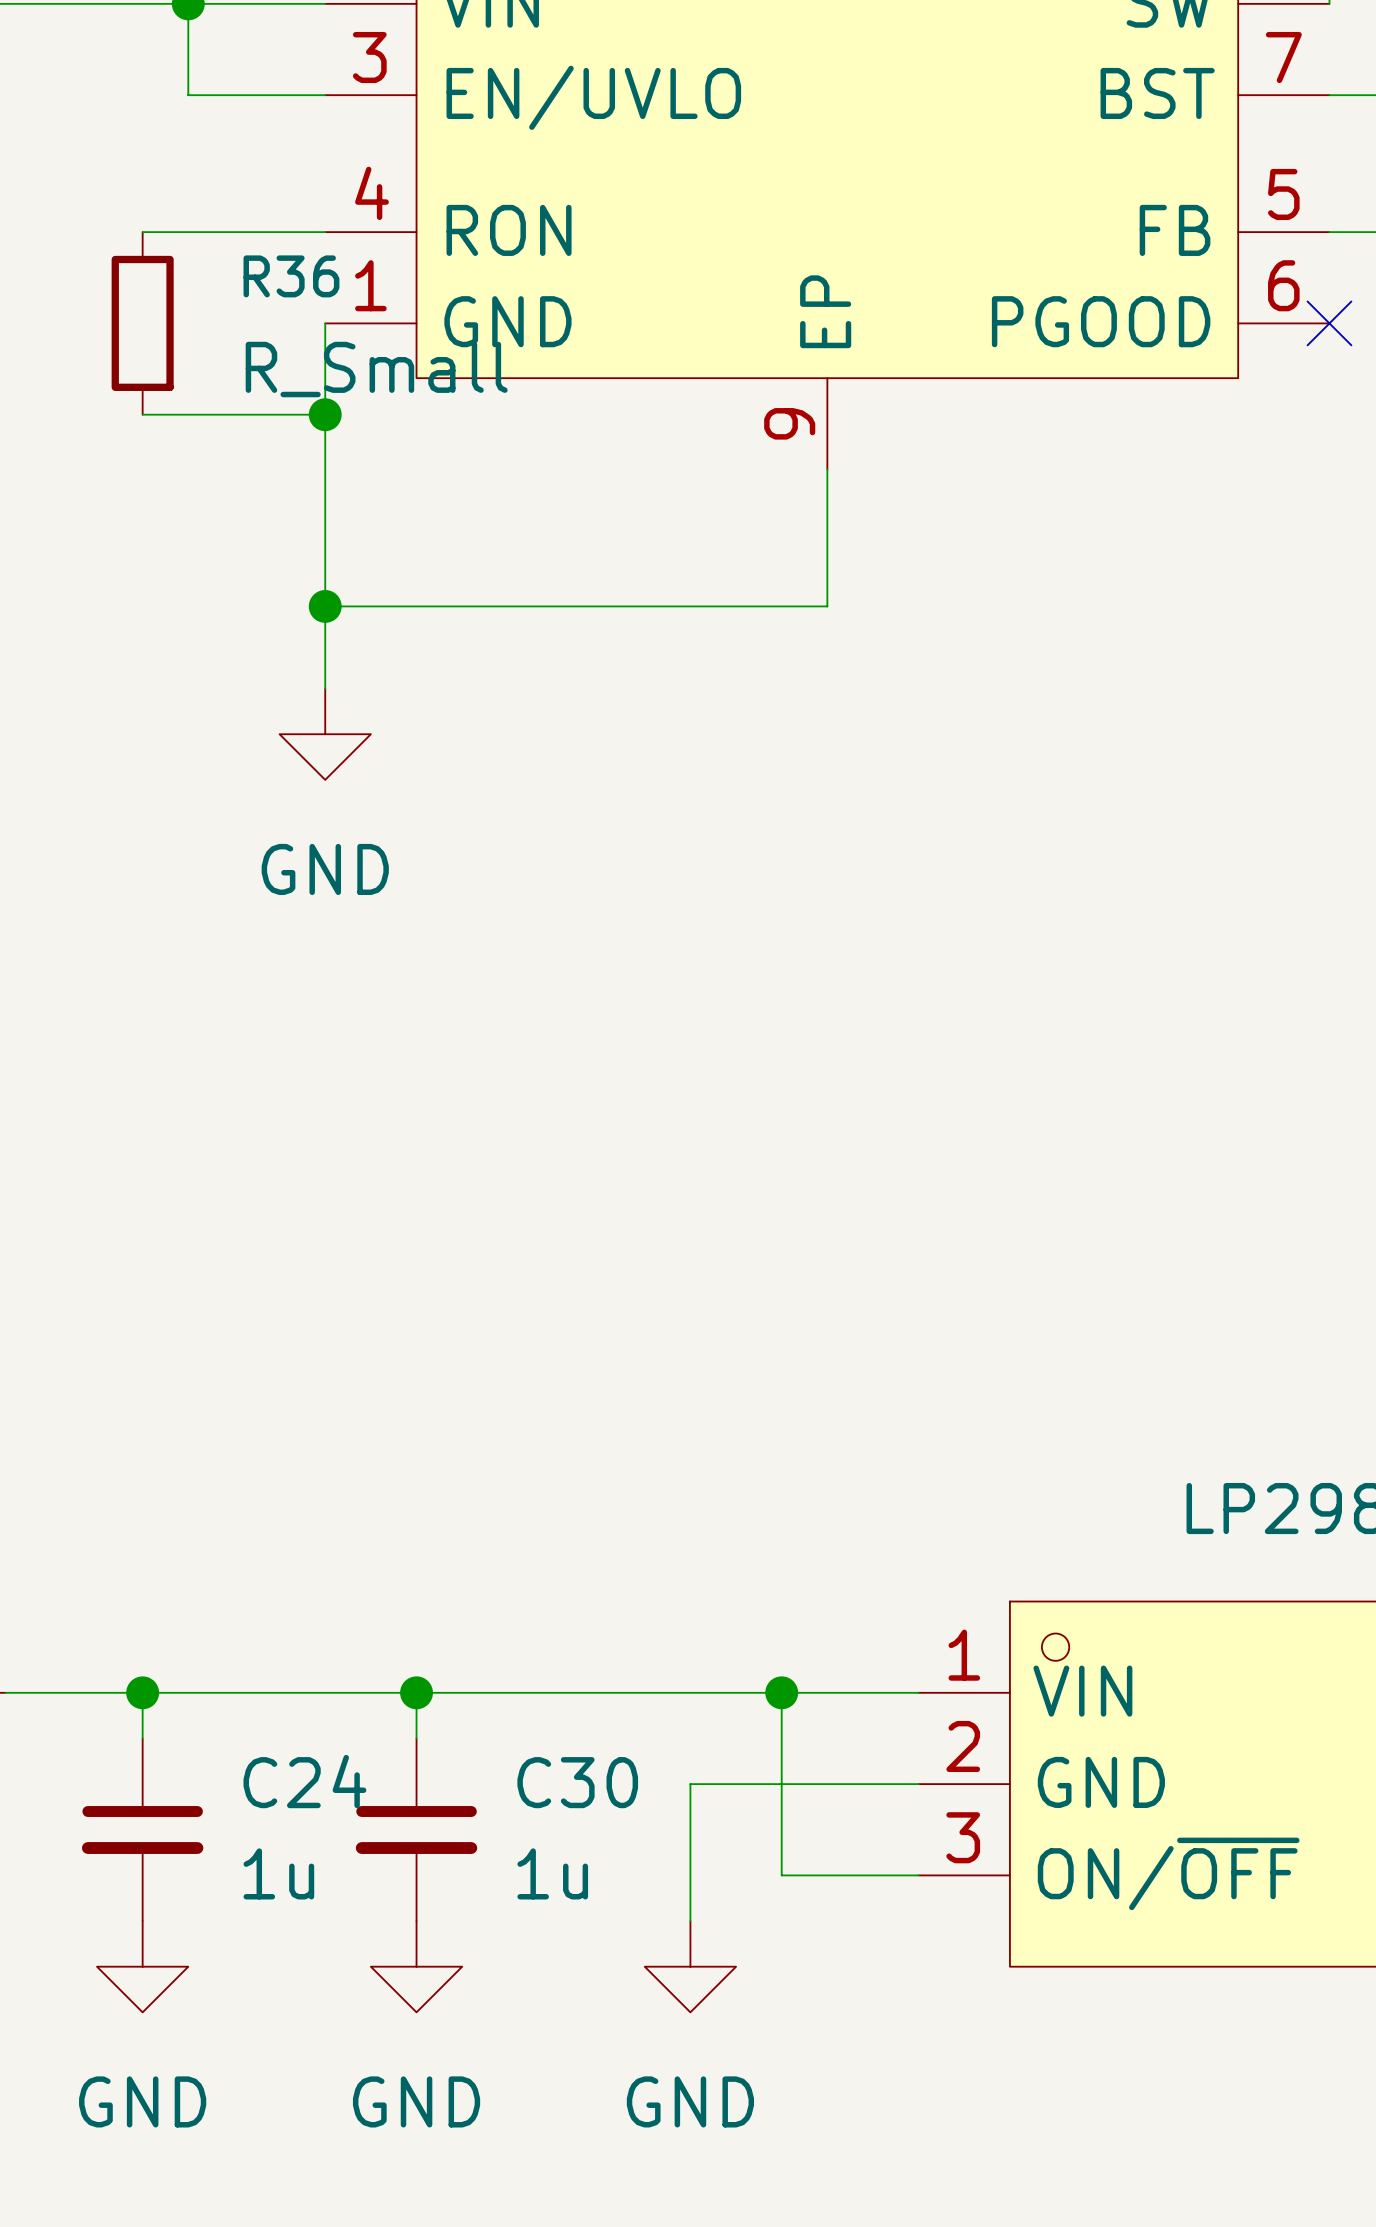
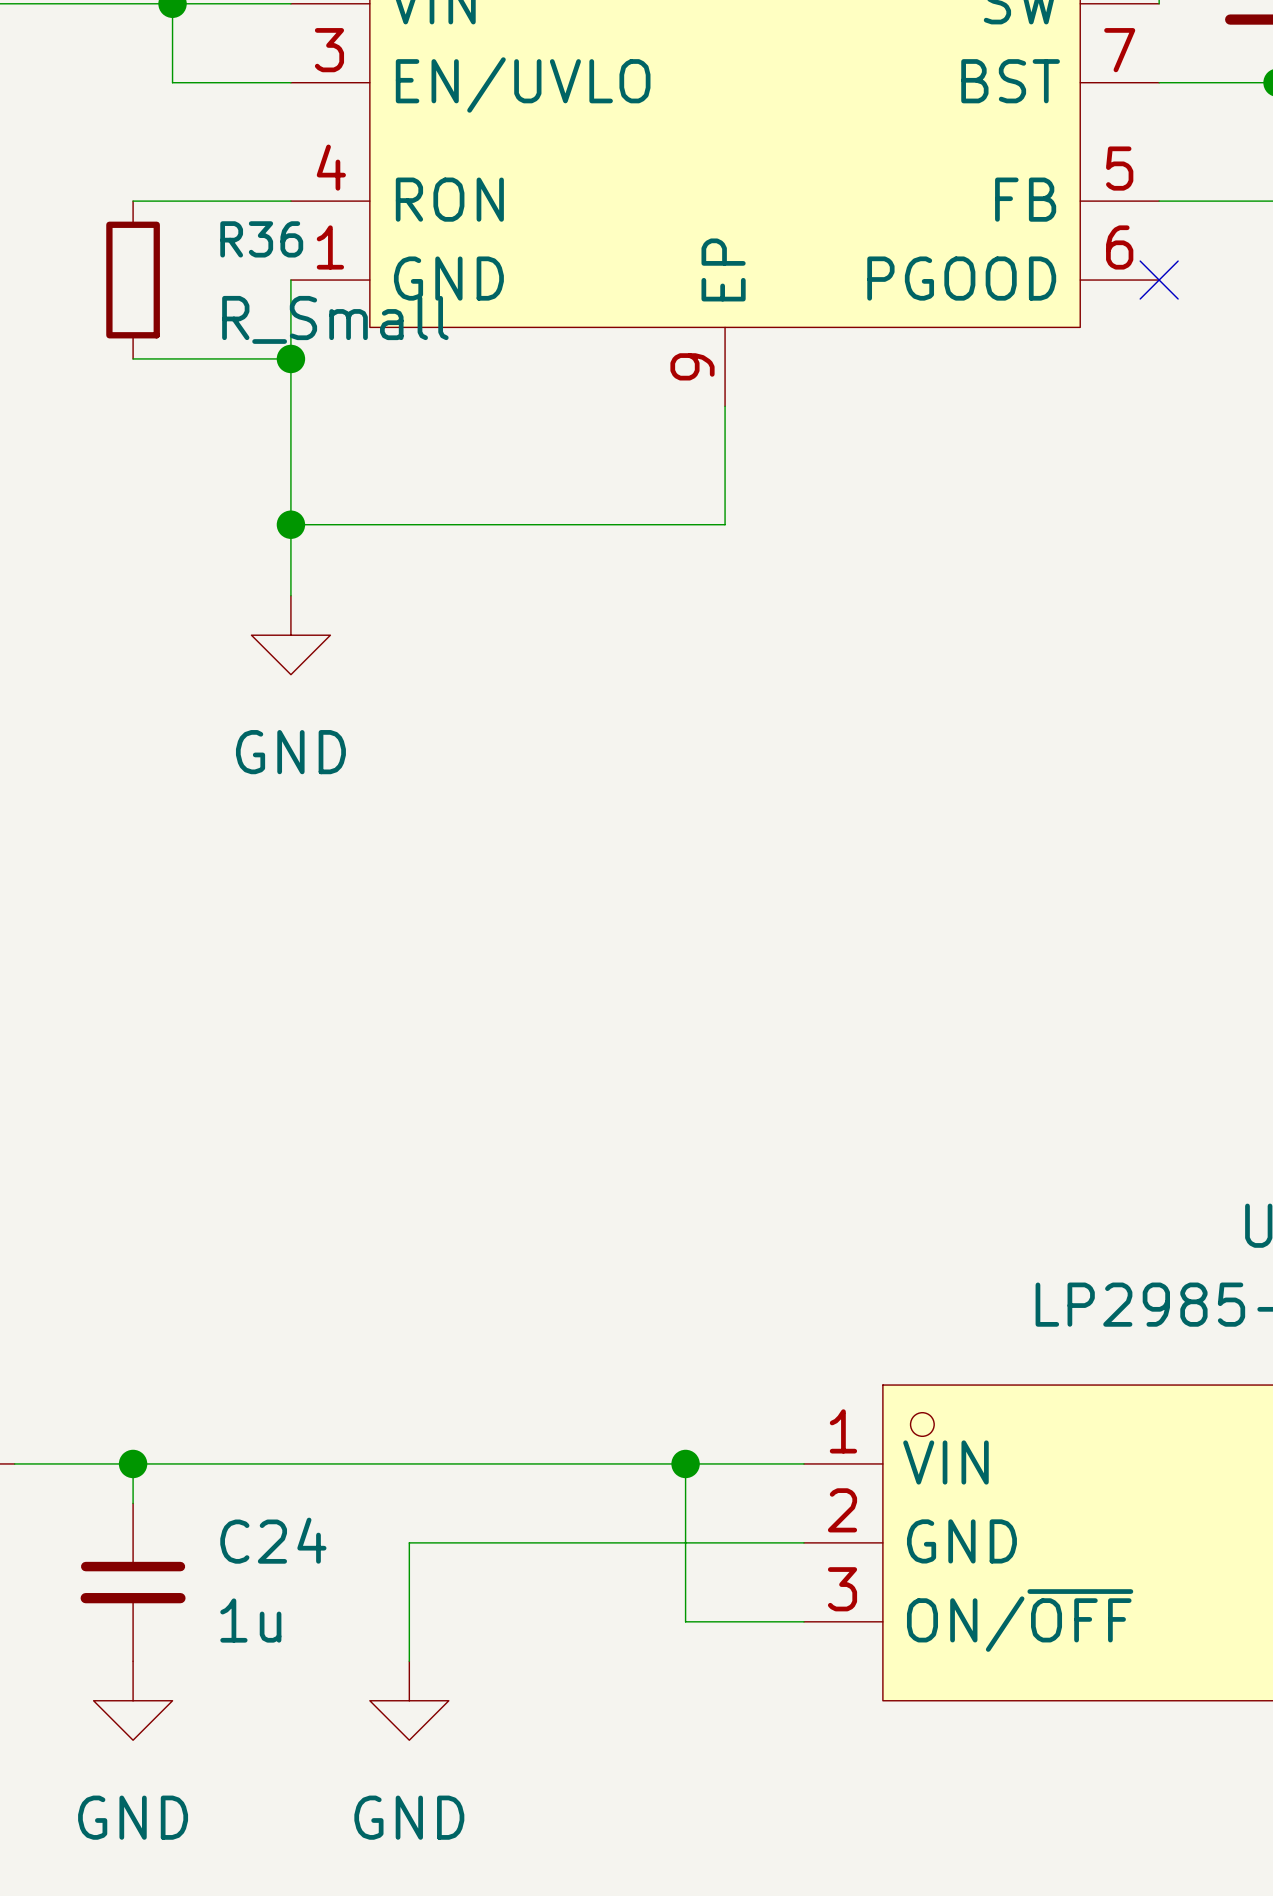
wire: (416, 1692) (416, 1738) -> none
junction: (416, 1692) -> none
wire: (690, 1784) (690, 1921) -> (606, 1542) (409, 1542) (409, 1661)
C30: 1u (416, 1829) -> none
power symbol position: GND (416, 1966) -> GND (409, 1700)
power symbol: GND (690, 1966) -> none

